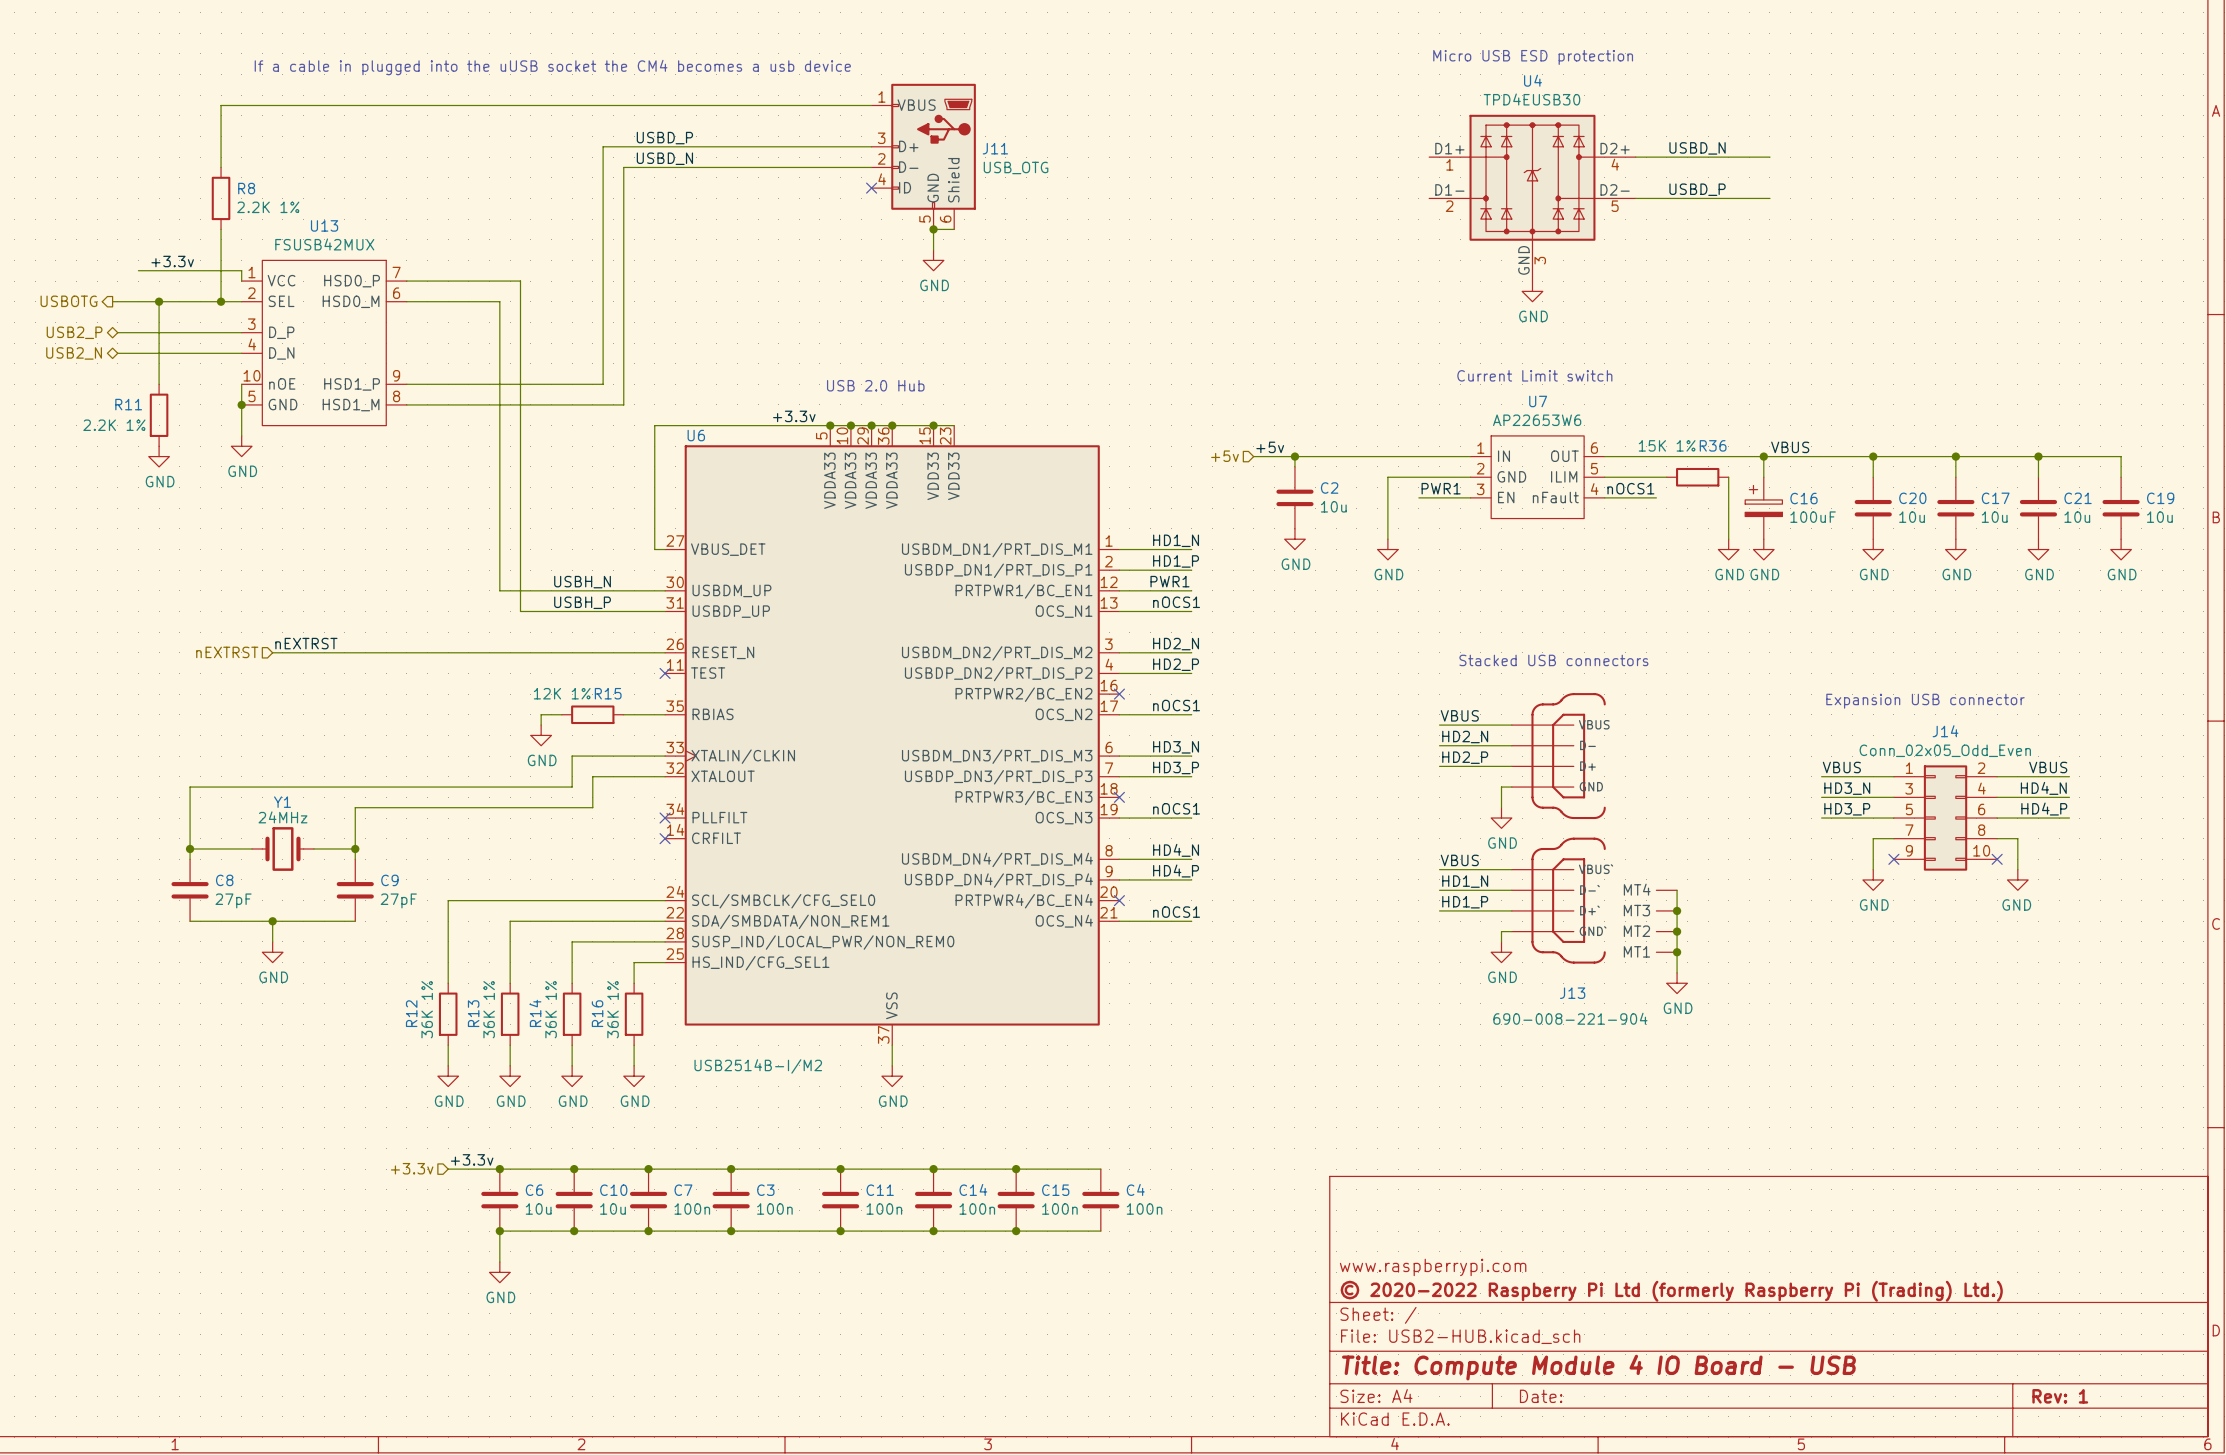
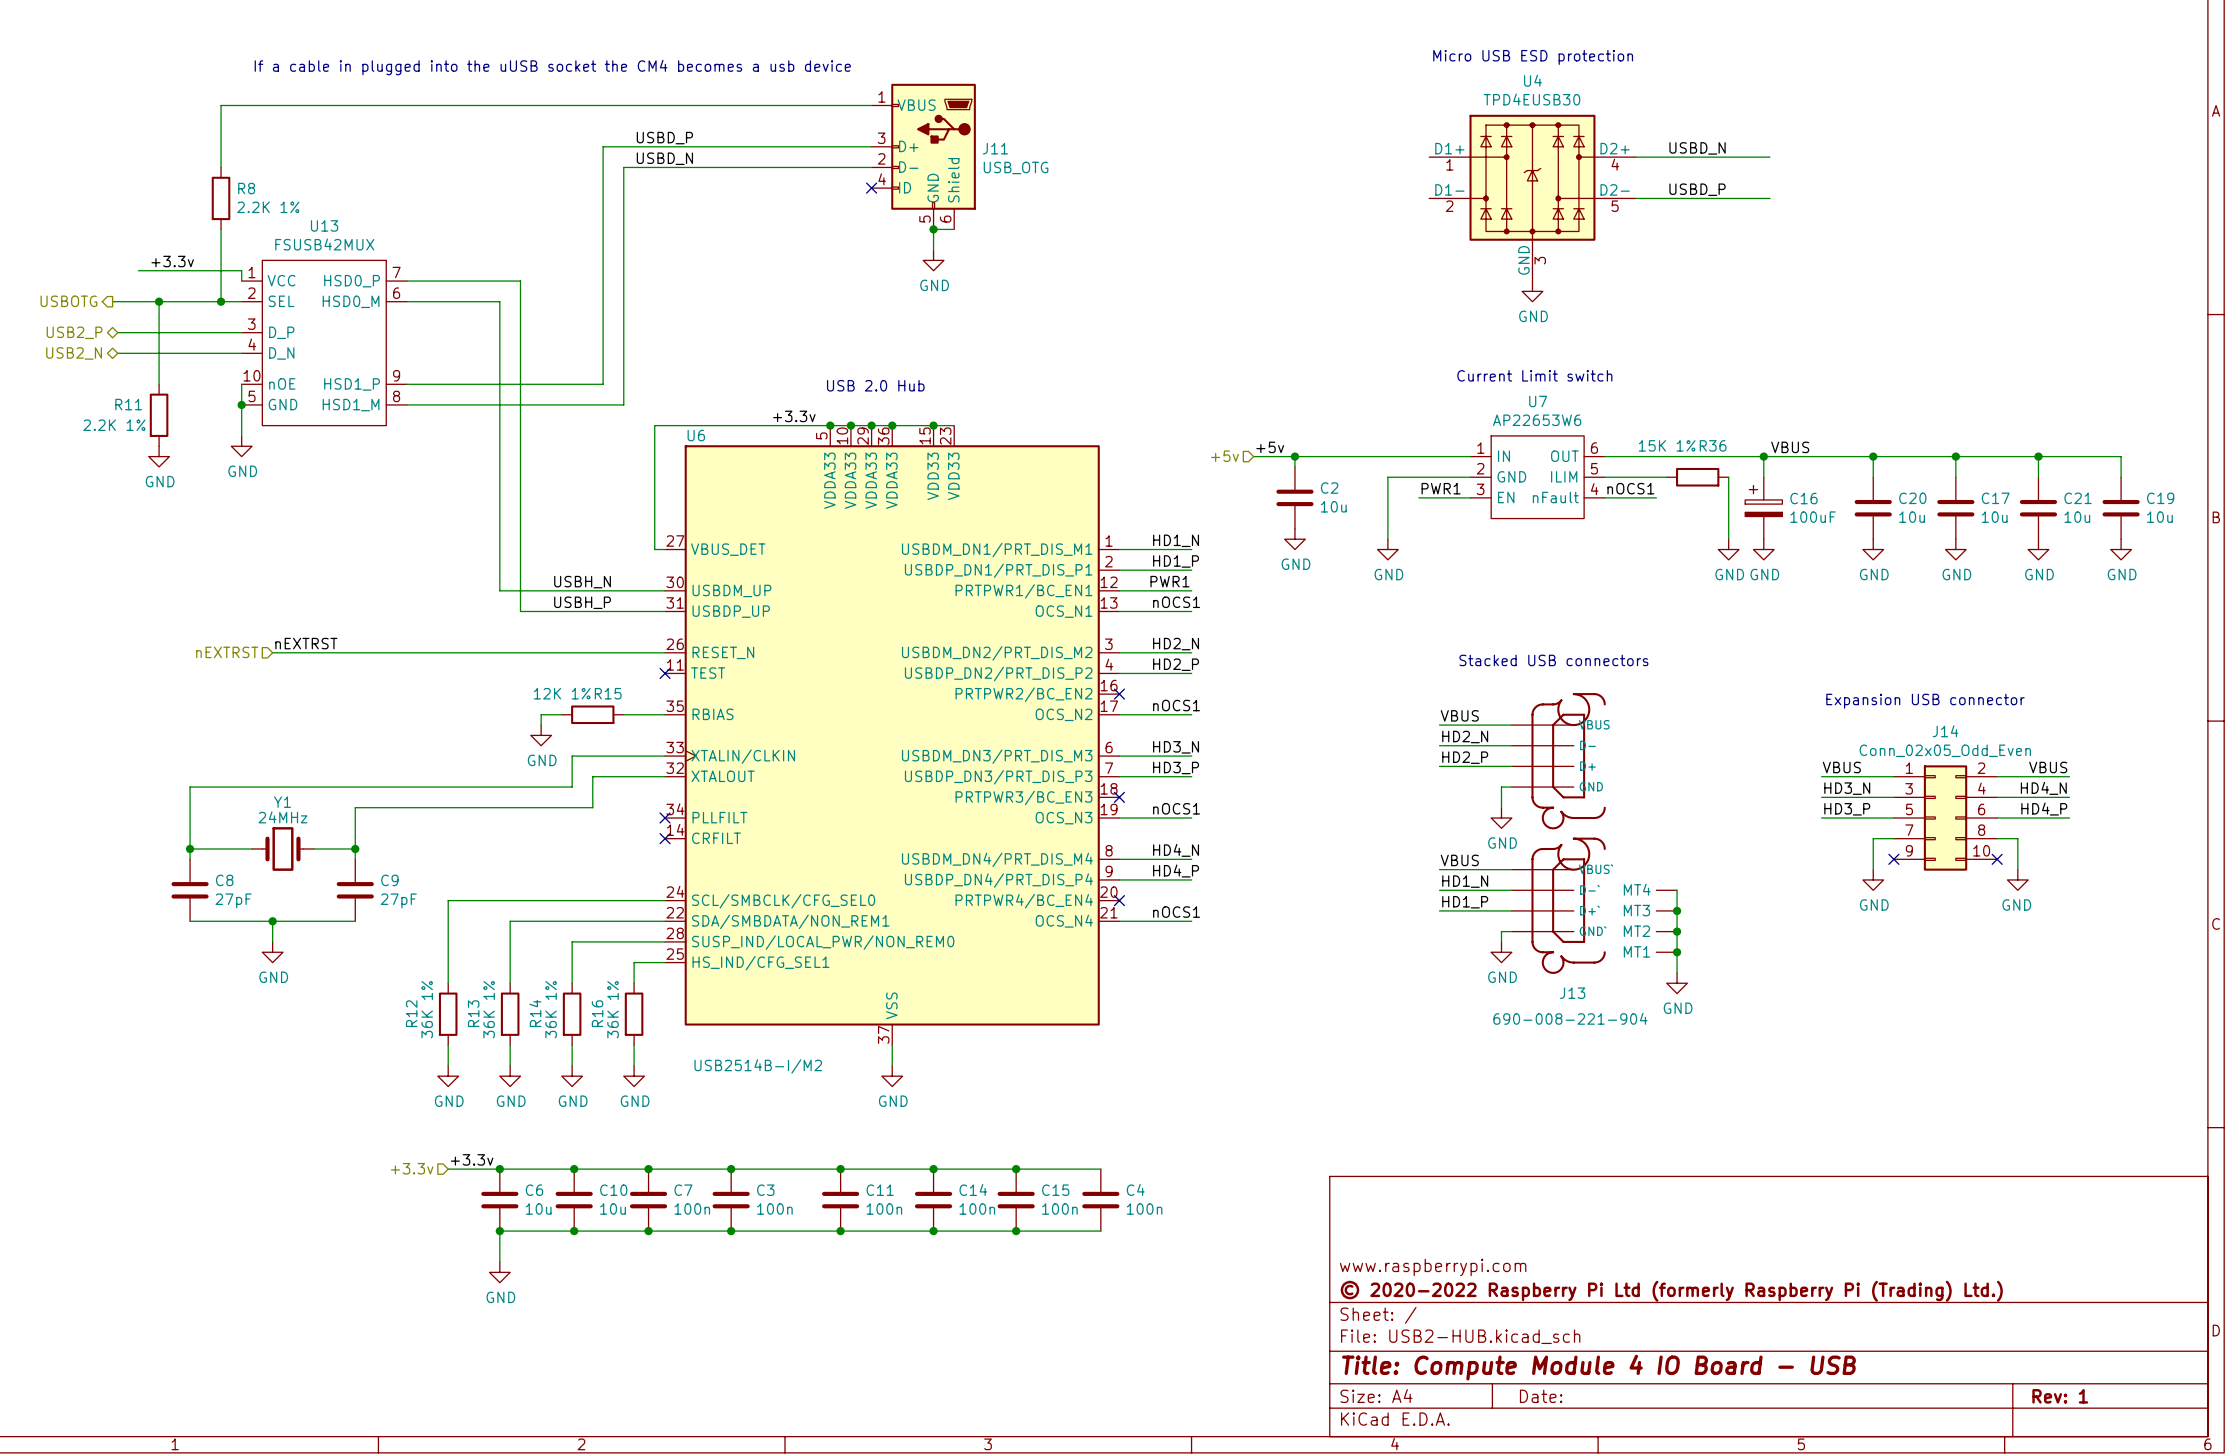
J13 symbol: [1511, 693, 1678, 964] -> [1511, 693, 1678, 974]

